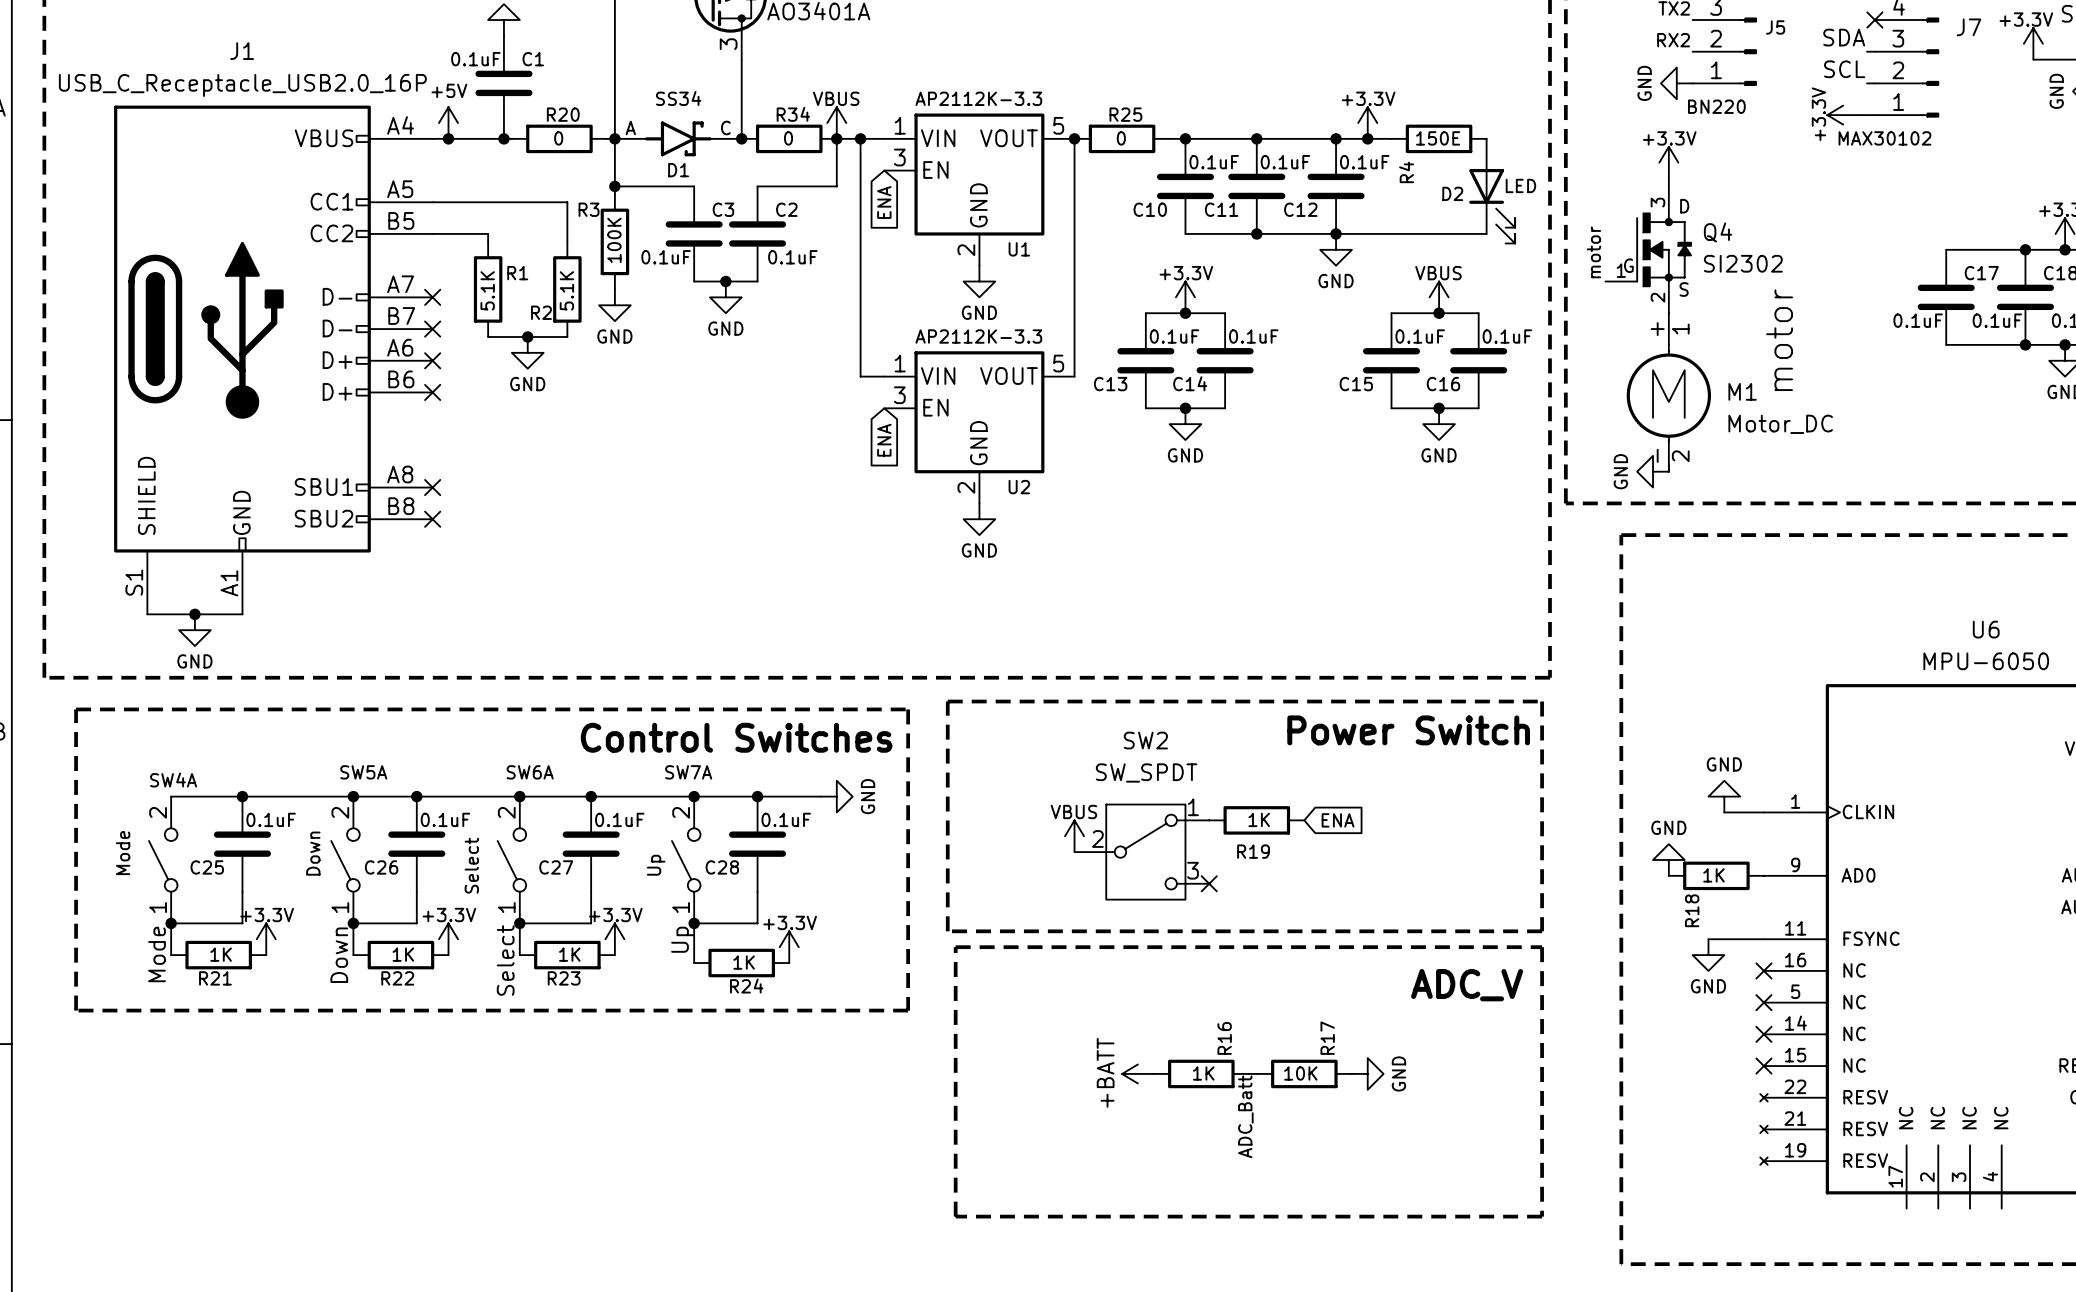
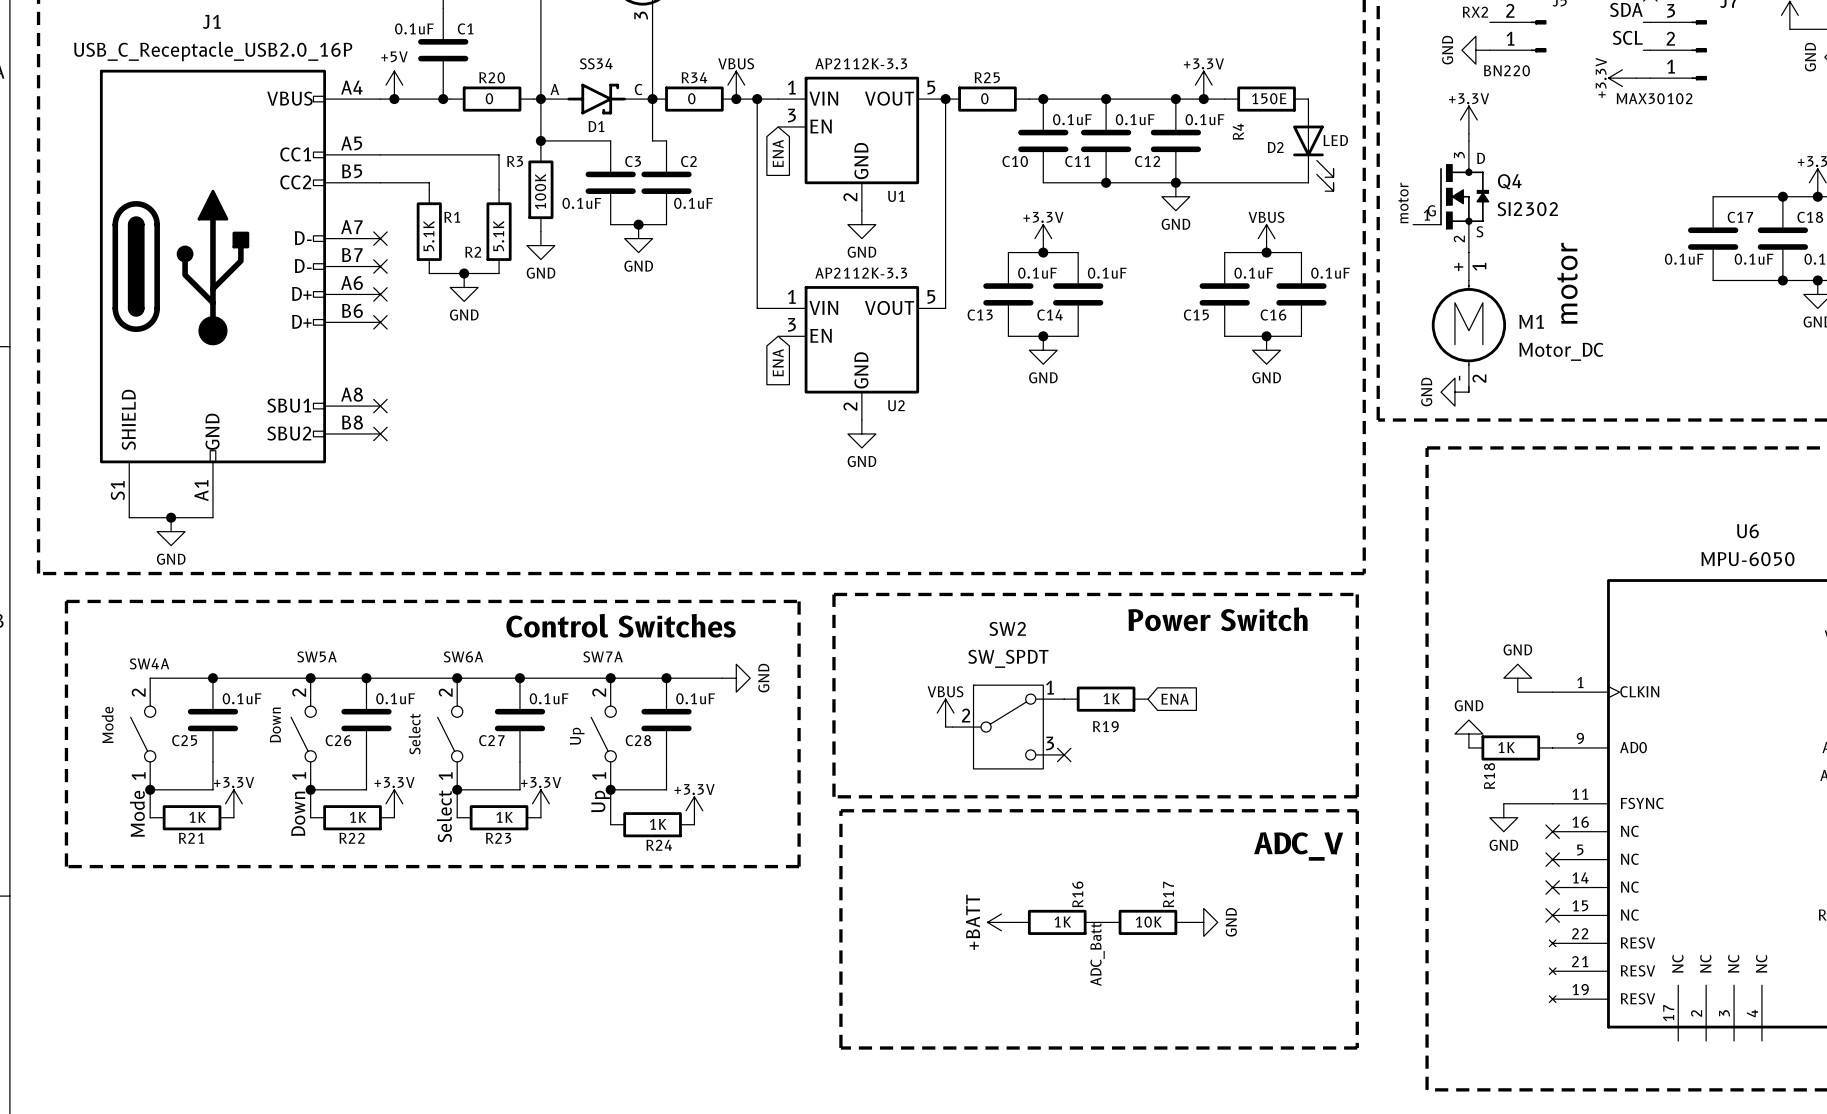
wire: (836, 138) (836, 186) (757, 186) -> (652, 99) (652, 140) (666, 140)

